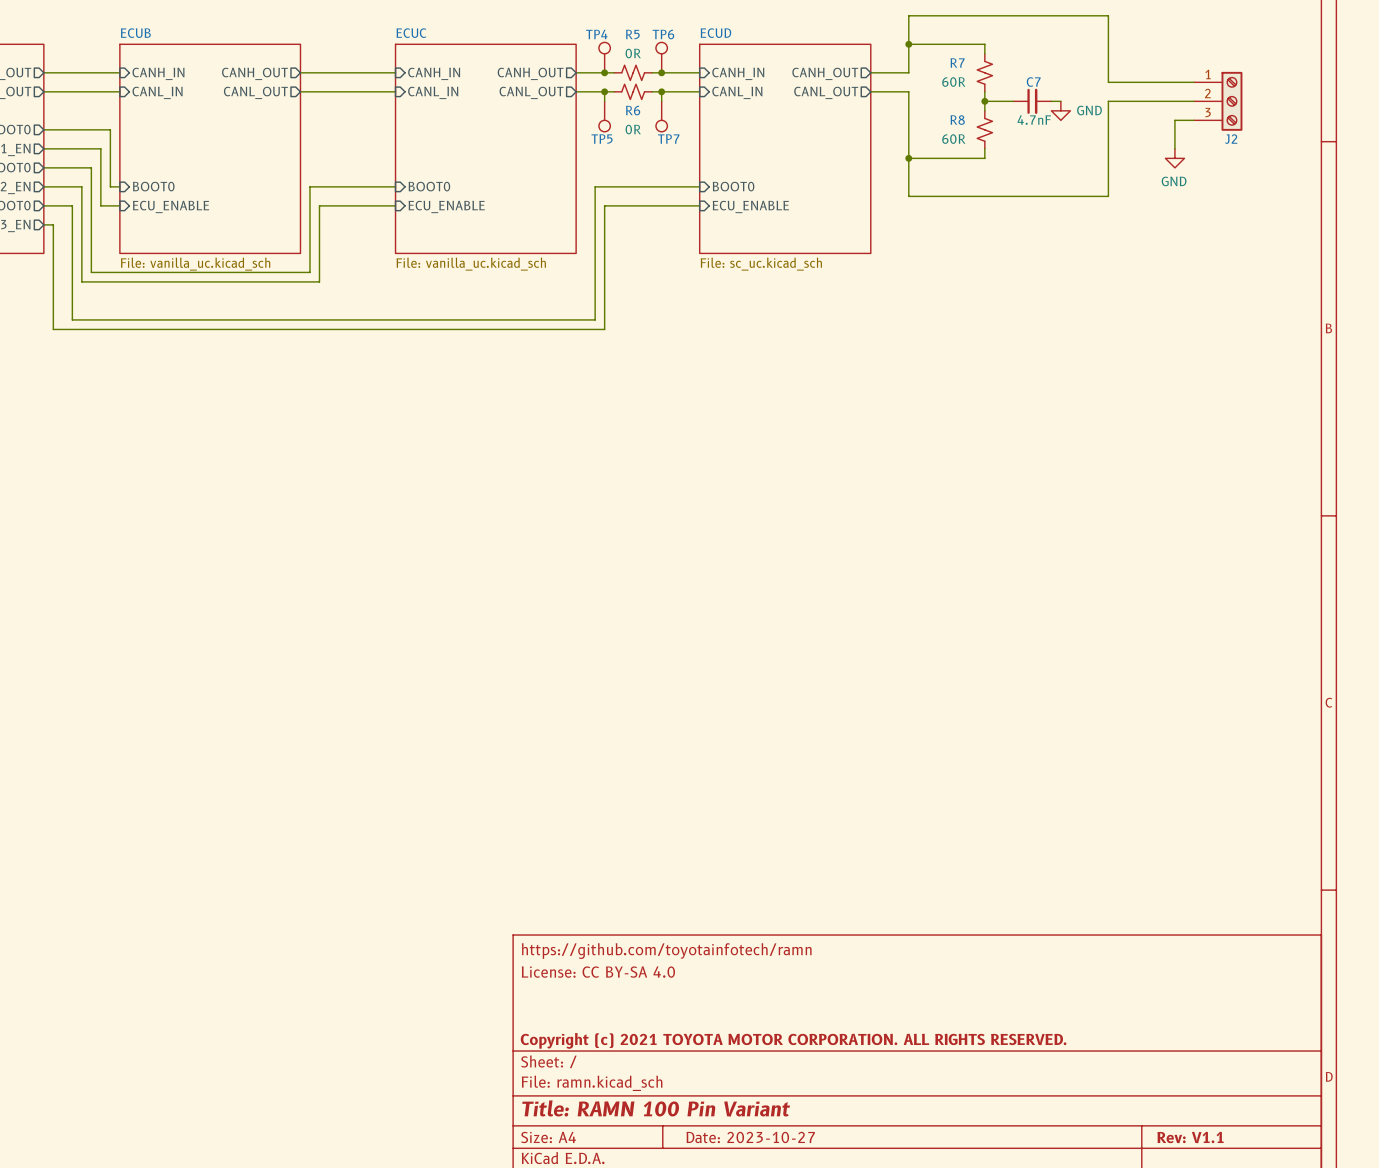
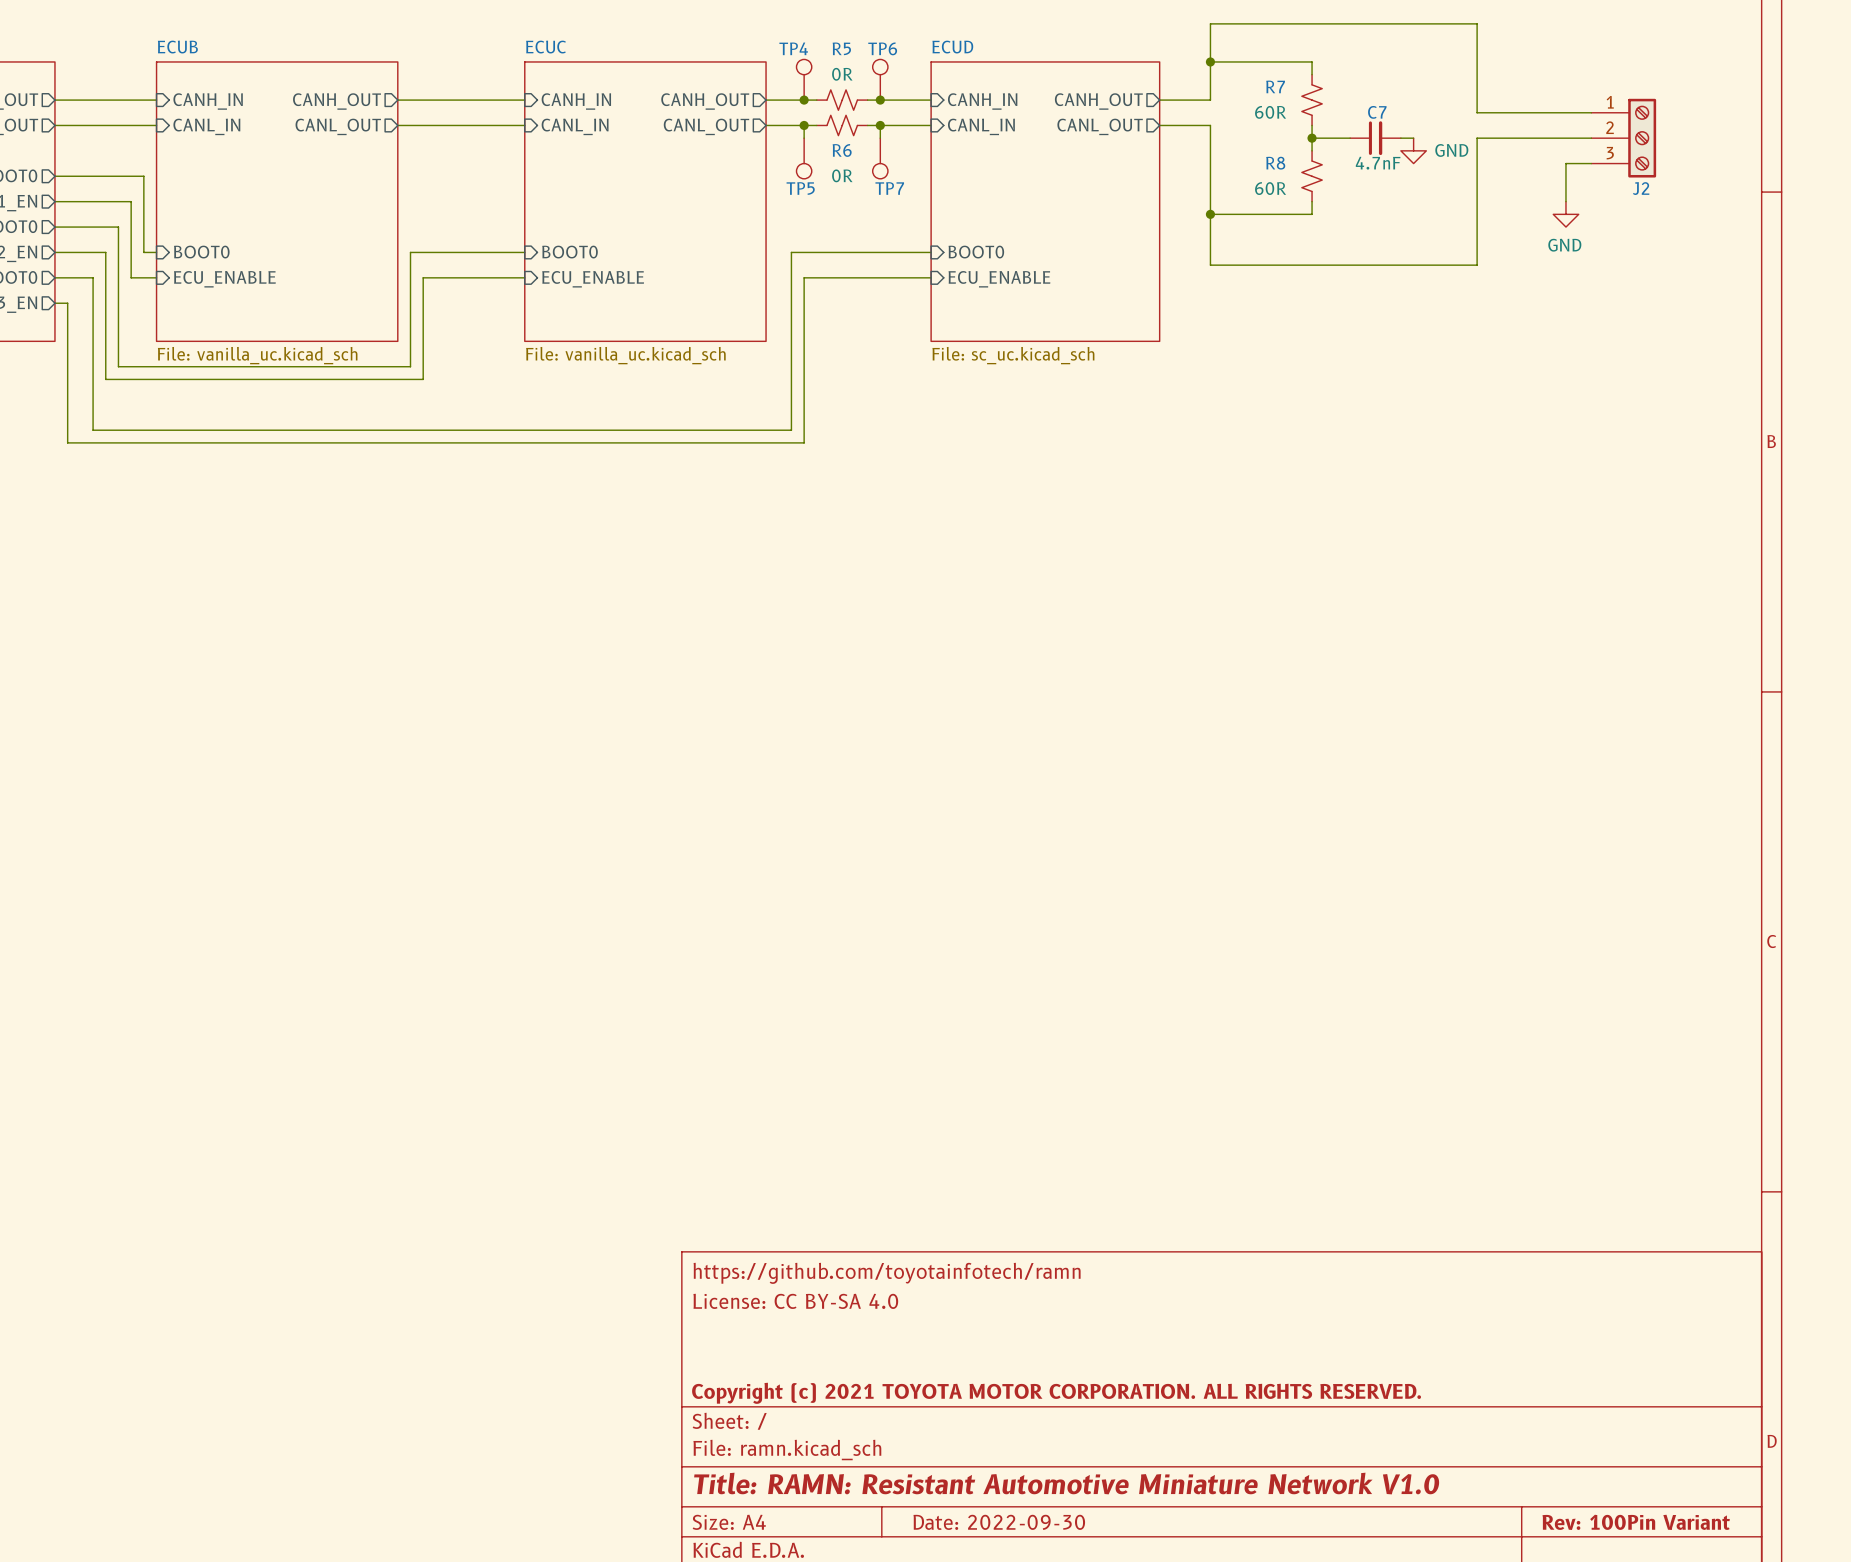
title block: Title: RAMN 100 Pin Variant (656, 1108) -> Title: RAMN: Resistant Automotive Miniature Network V1.0 (1066, 1483)
title block: Date: 2023-10-27 (750, 1137) -> Date: 2022-09-30 (999, 1522)
title block: Rev: V1.1 (1190, 1137) -> Rev: 100Pin Variant (1636, 1522)

